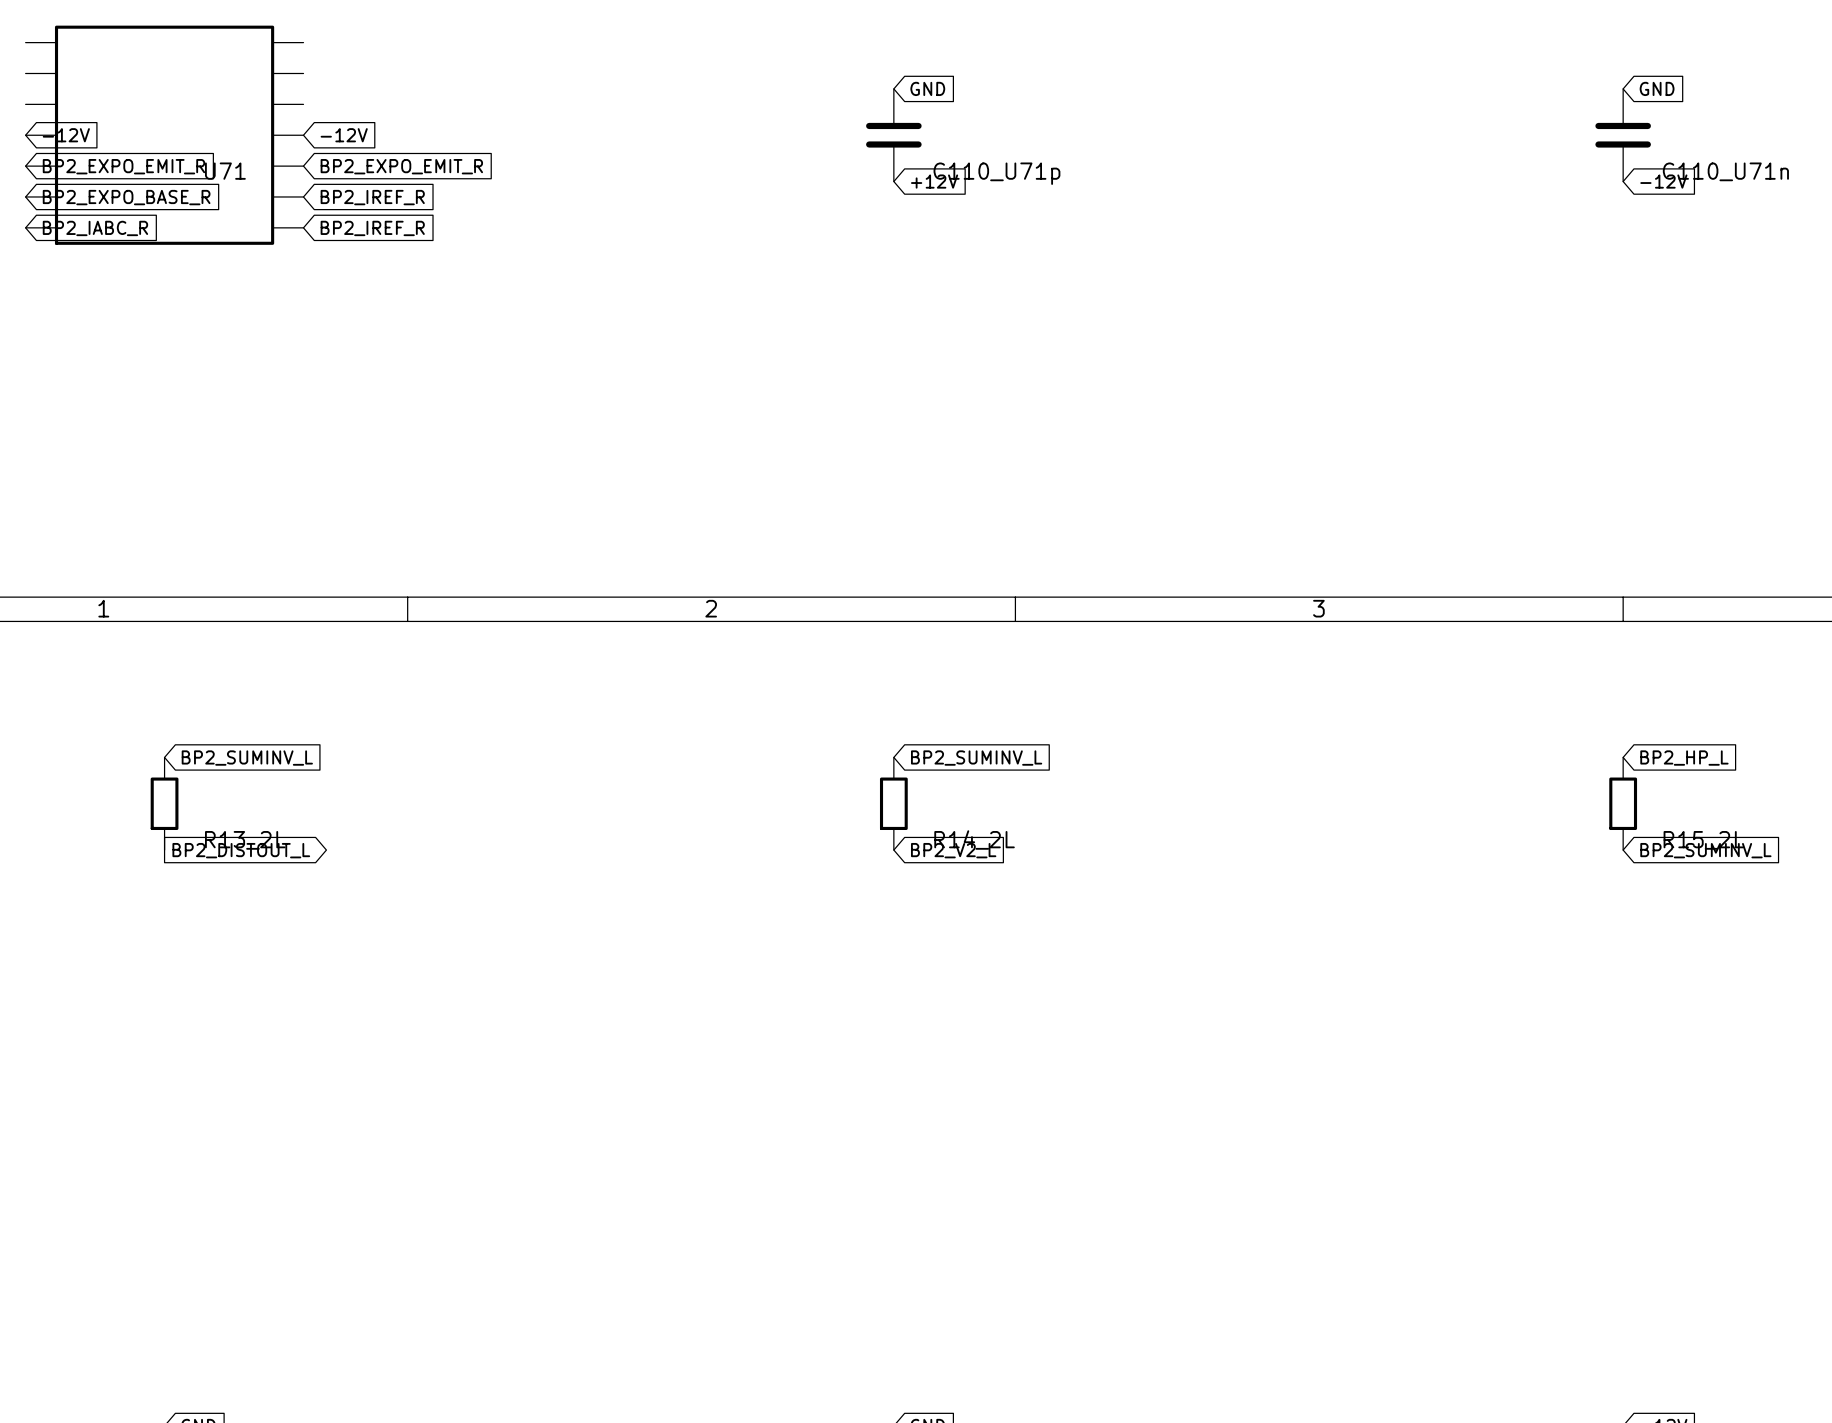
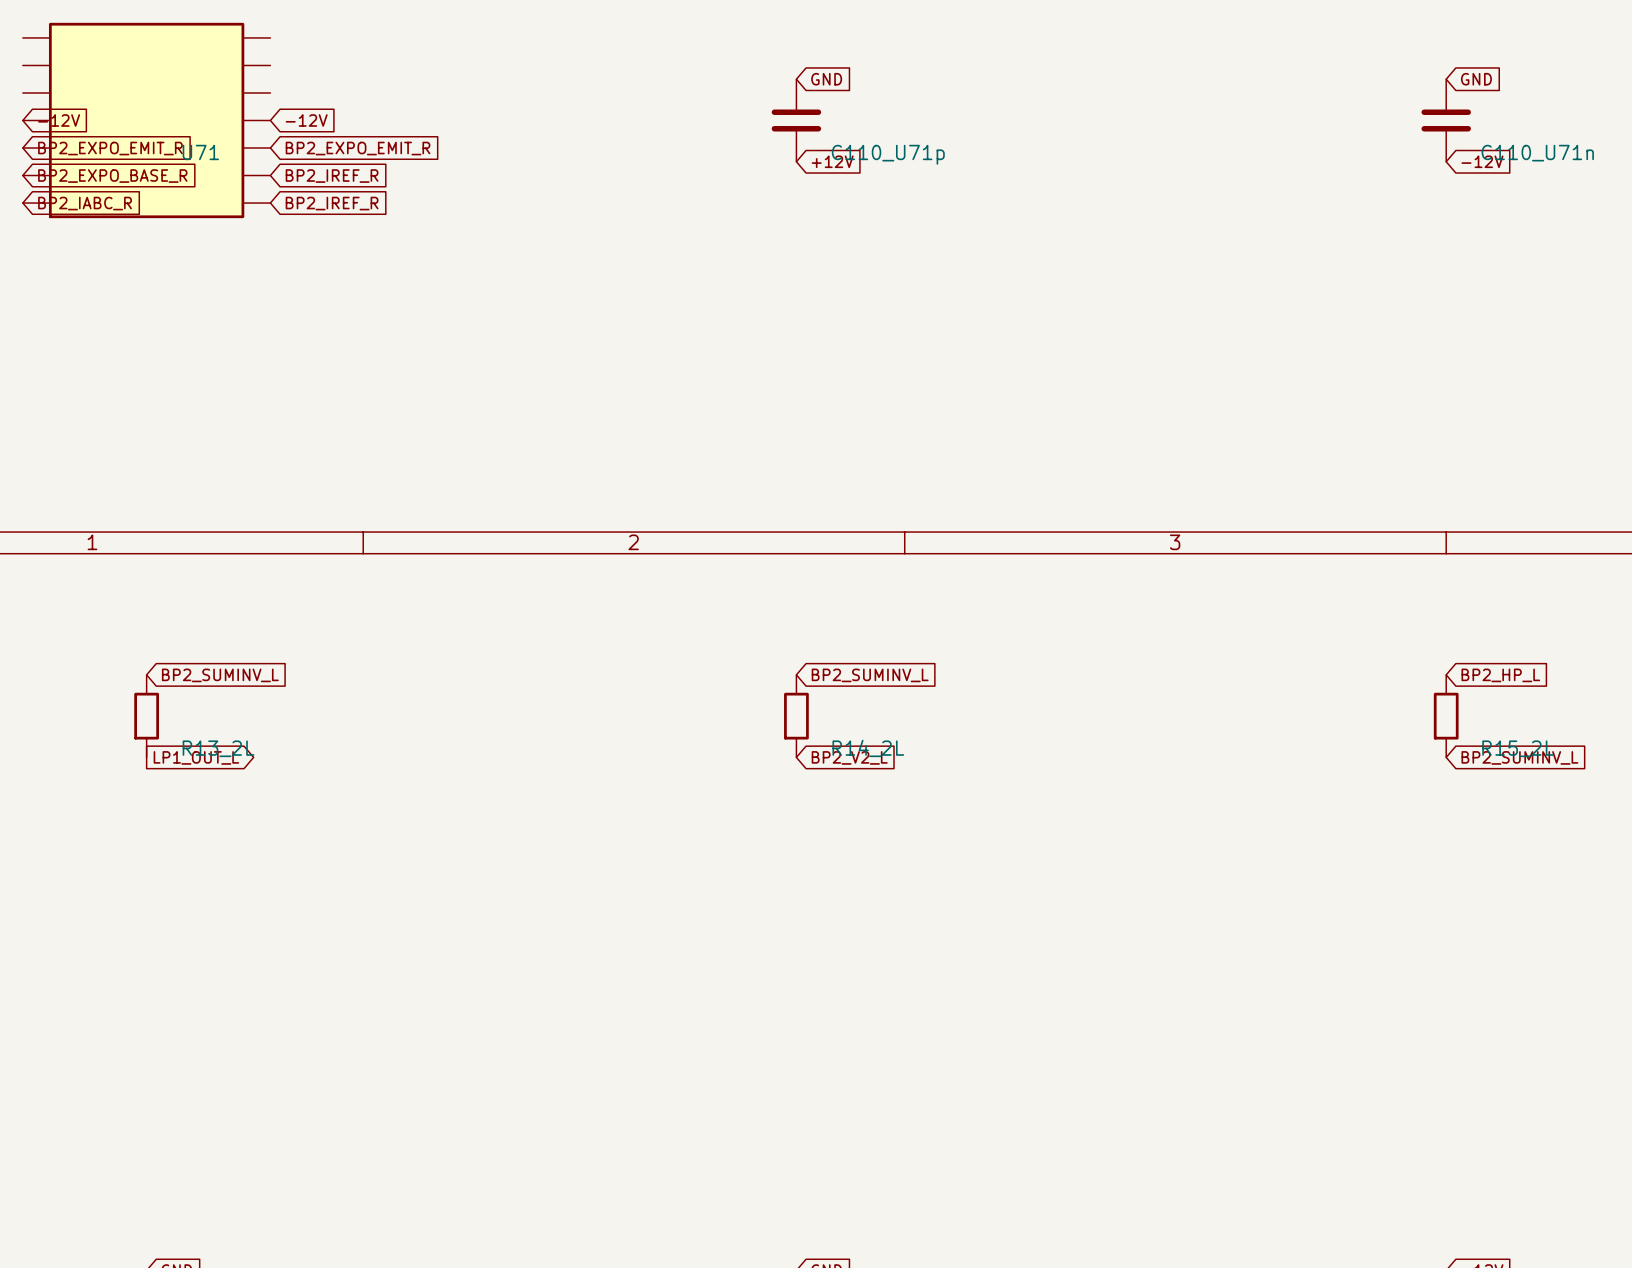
global label: BP2_DISTOUT_L (241, 850) -> LP1_OUT_L (196, 757)

